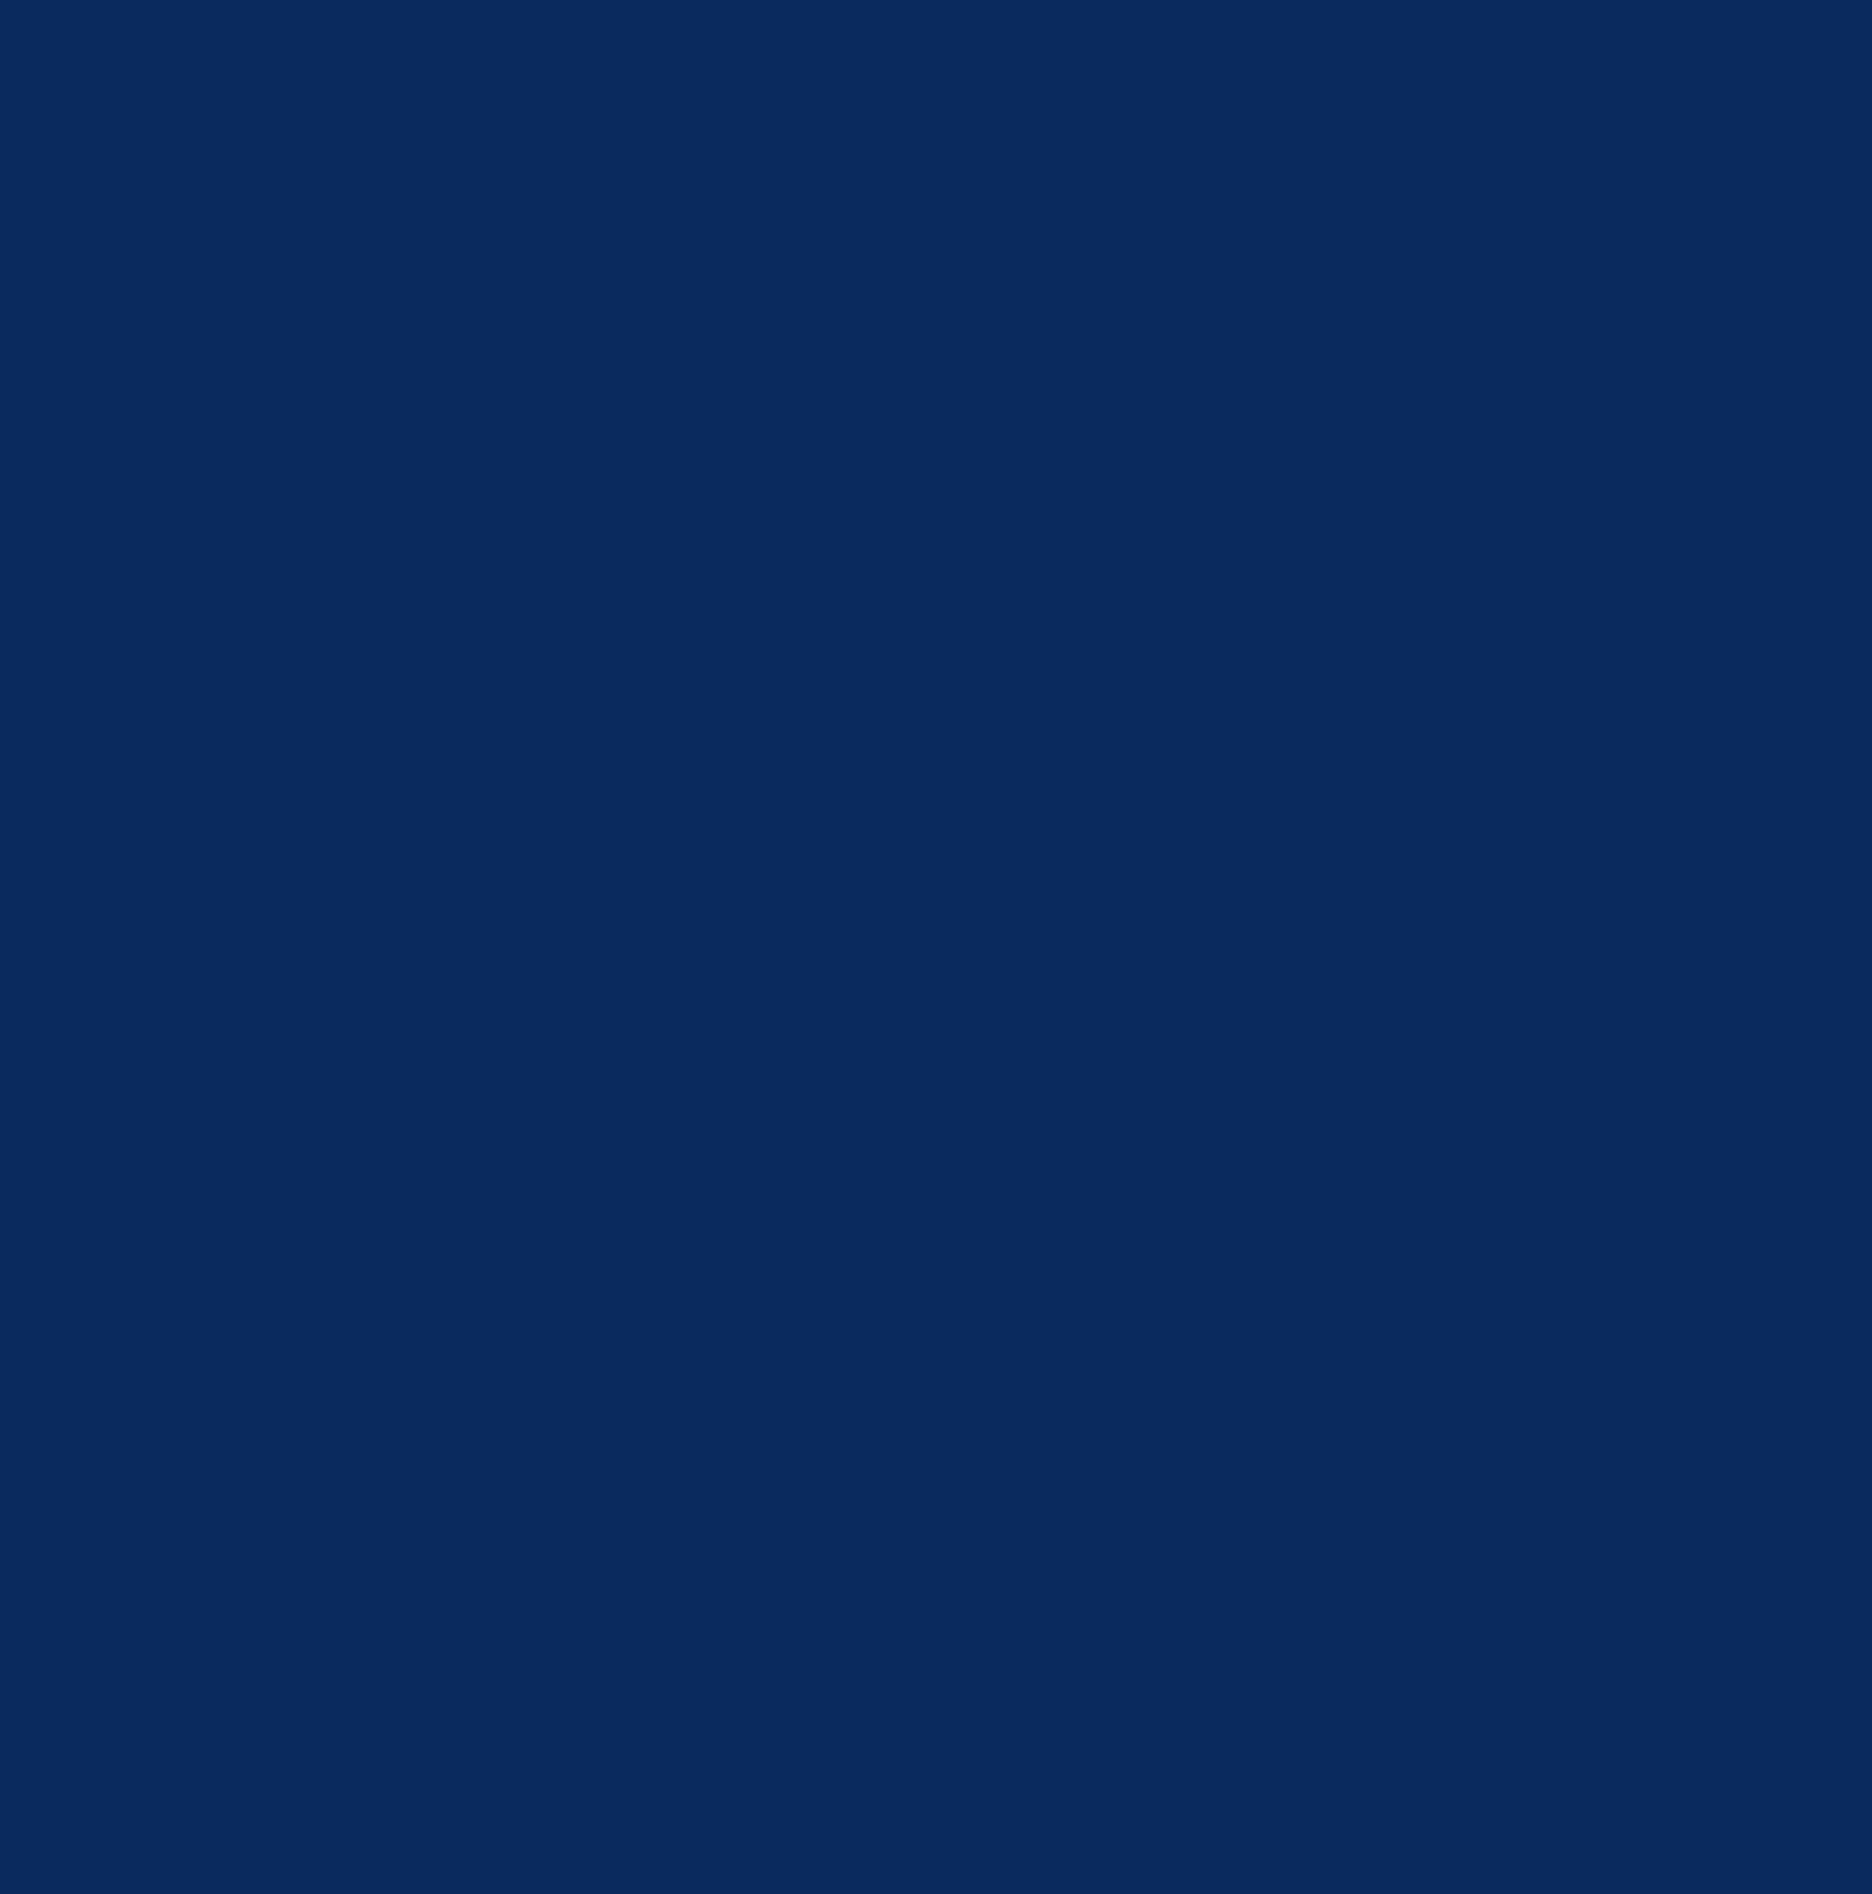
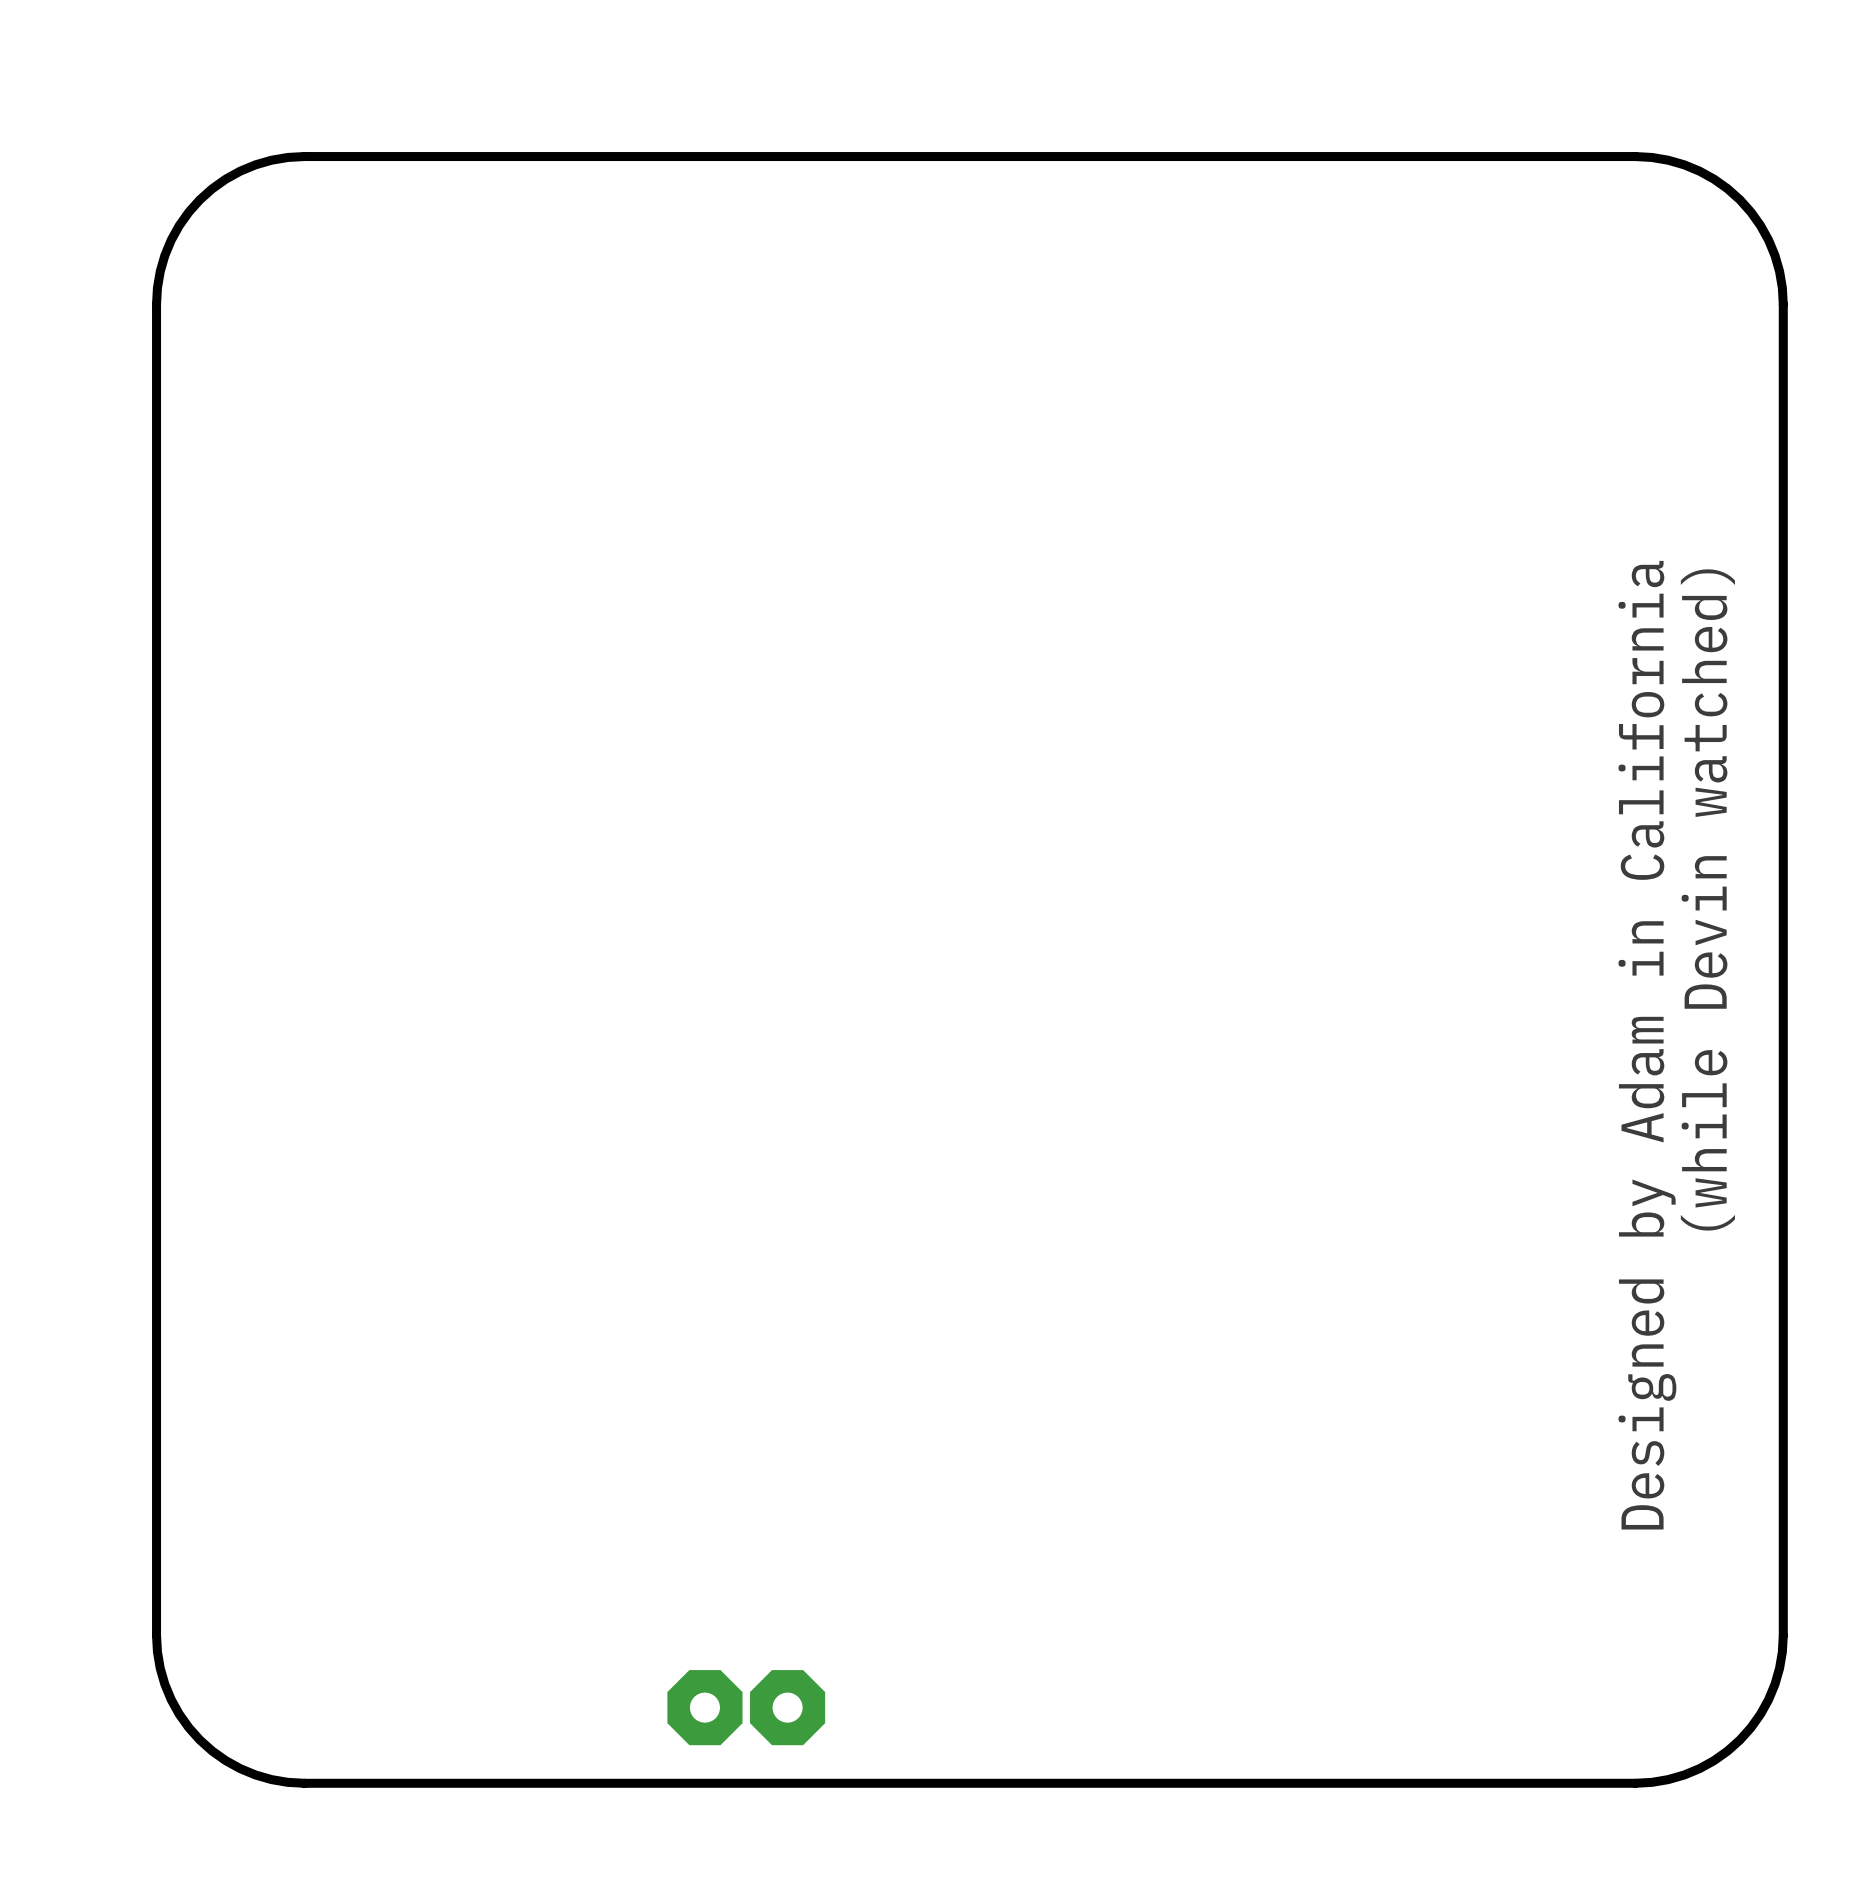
board edge: none -> (1635, 156) (304, 156) (287, 157) (255, 164) (225, 179) (199, 199) (179, 225) (164, 255) (157, 287) (156, 304) (156, 1635) (157, 1651) (164, 1684) (179, 1714) (199, 1739) (225, 1760) (255, 1774) (287, 1782) (304, 1783) (1635, 1783) (1651, 1782) (1684, 1774) (1714, 1760) (1739, 1739) (1760, 1714) (1774, 1684) (1782, 1651) (1783, 1635) (1782, 287) (1774, 255) (1760, 225) (1751, 212) (1727, 188) (1714, 179) (1684, 164) (1651, 157) (1635, 156)
text: none -> (while Devin watched) (1707, 899)
text: none -> Designed by Adam in California (1647, 1045)
part: none -> (704, 1707)
part: none -> (787, 1707)

